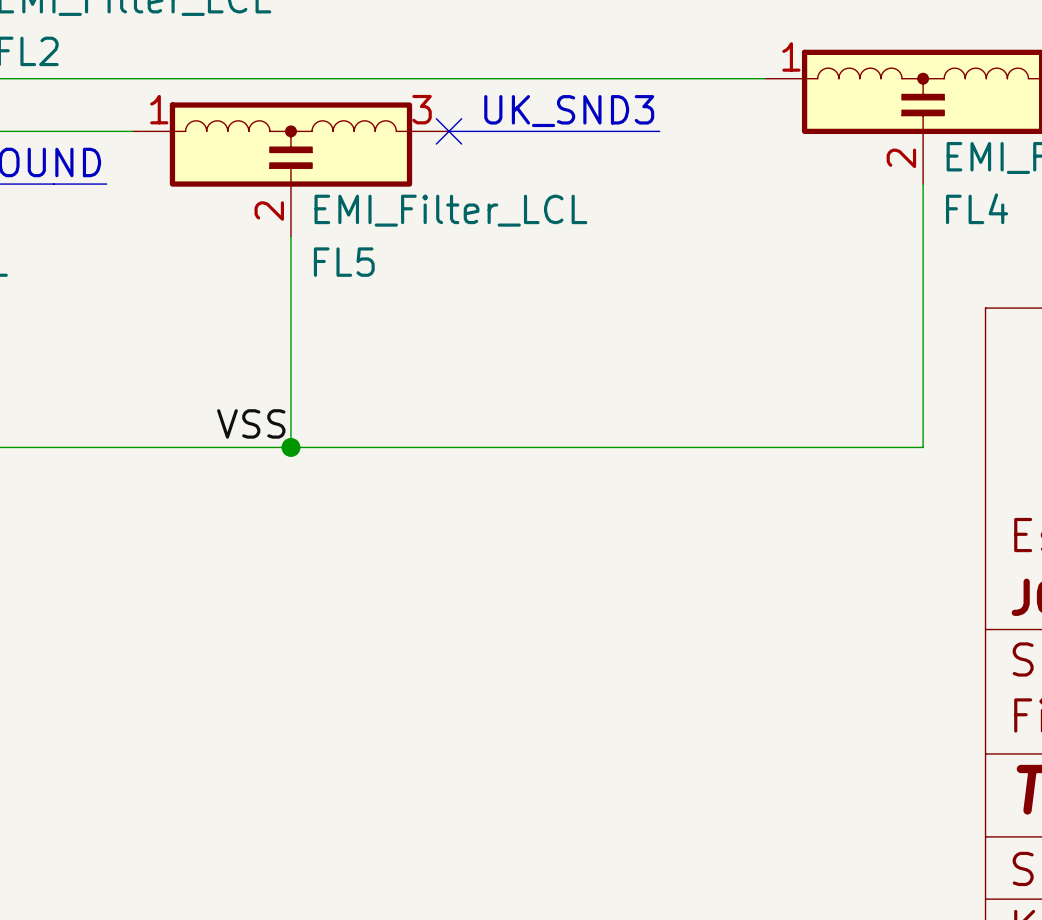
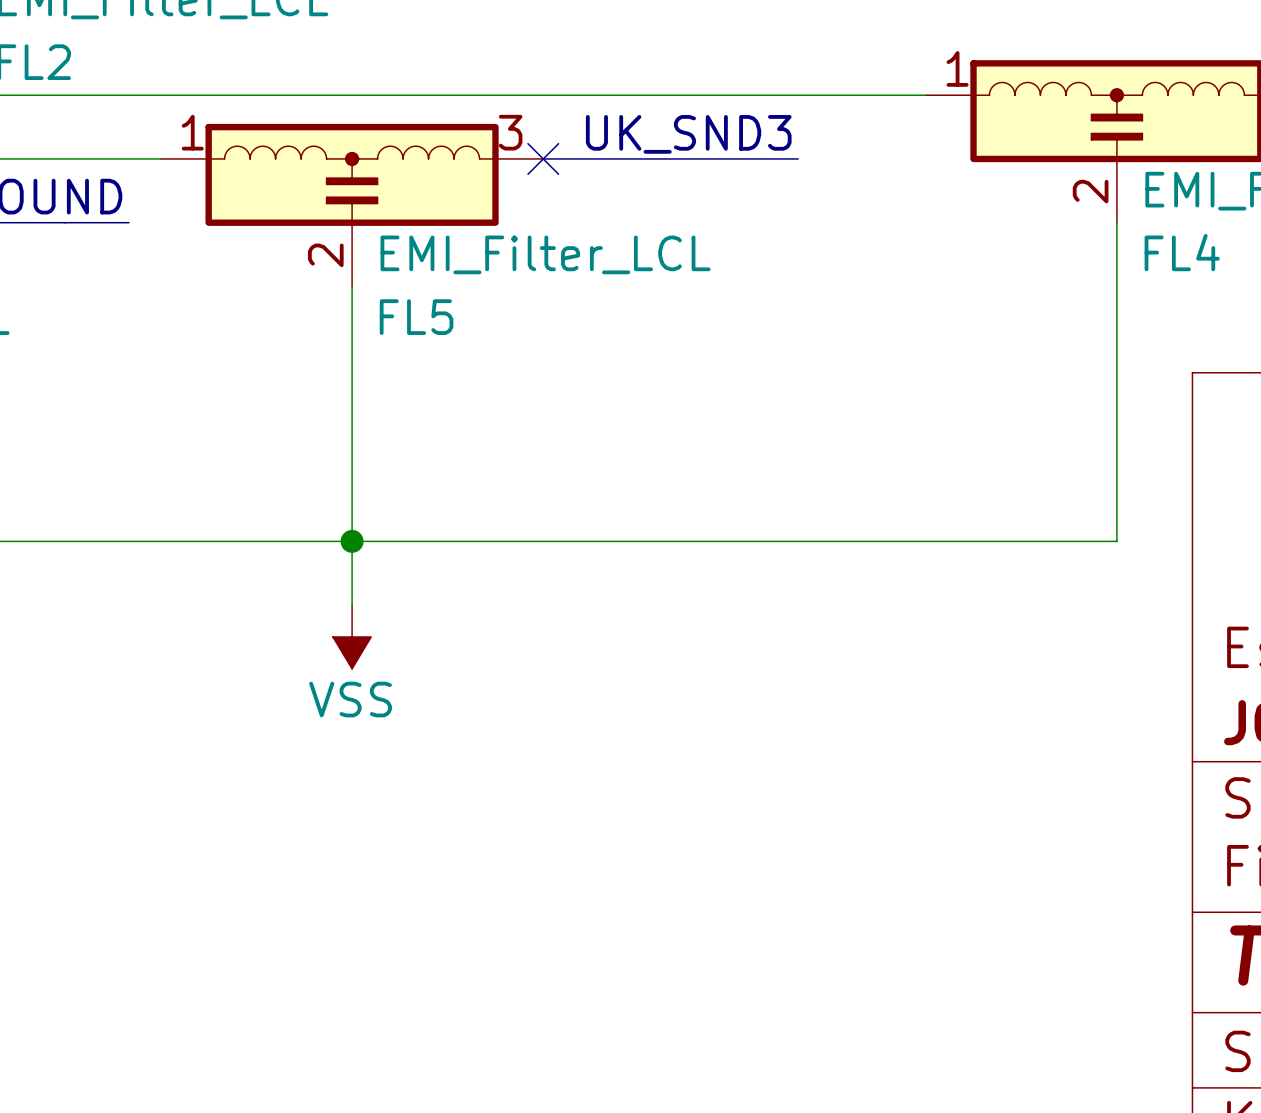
label: VSS (251, 423) -> none
wire: none -> (352, 541) (352, 605)
power symbol: none -> VSS (352, 636)

